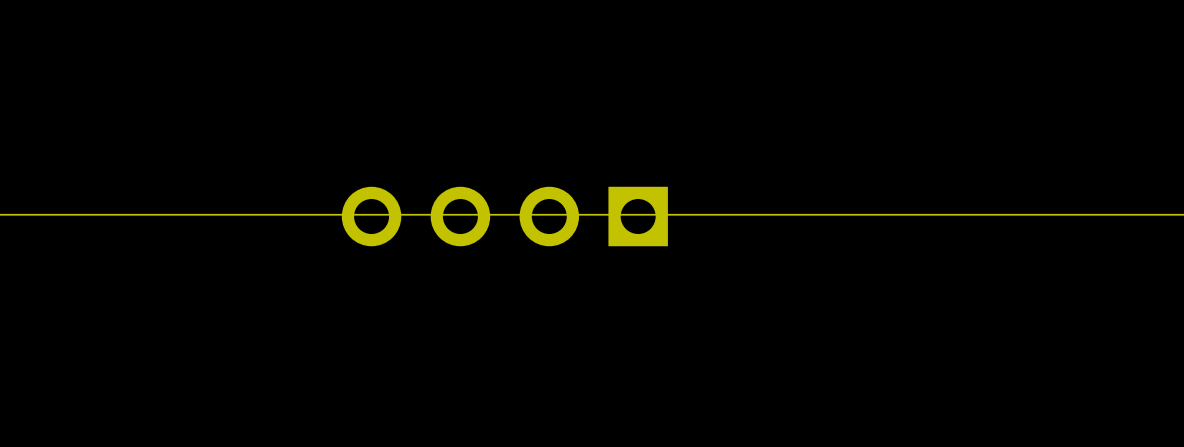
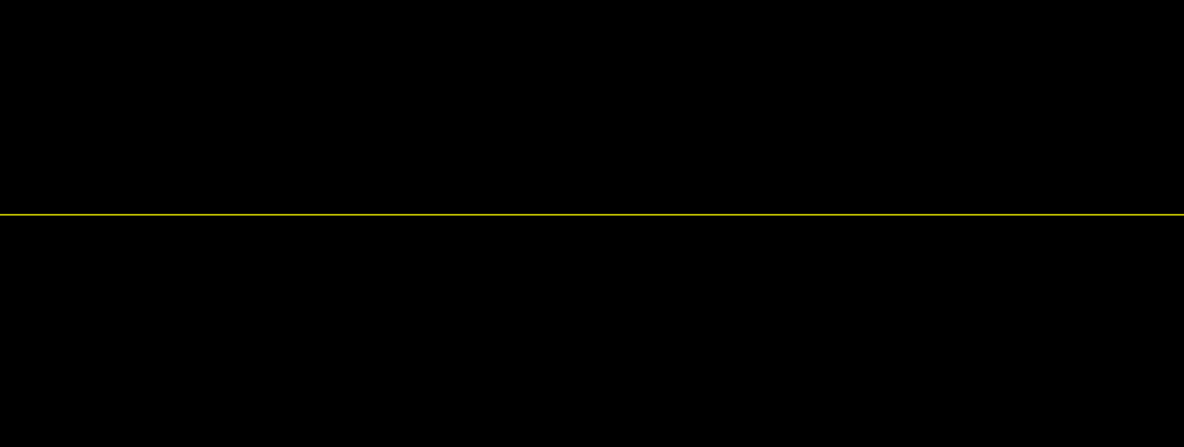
part: (504, 216) -> none

